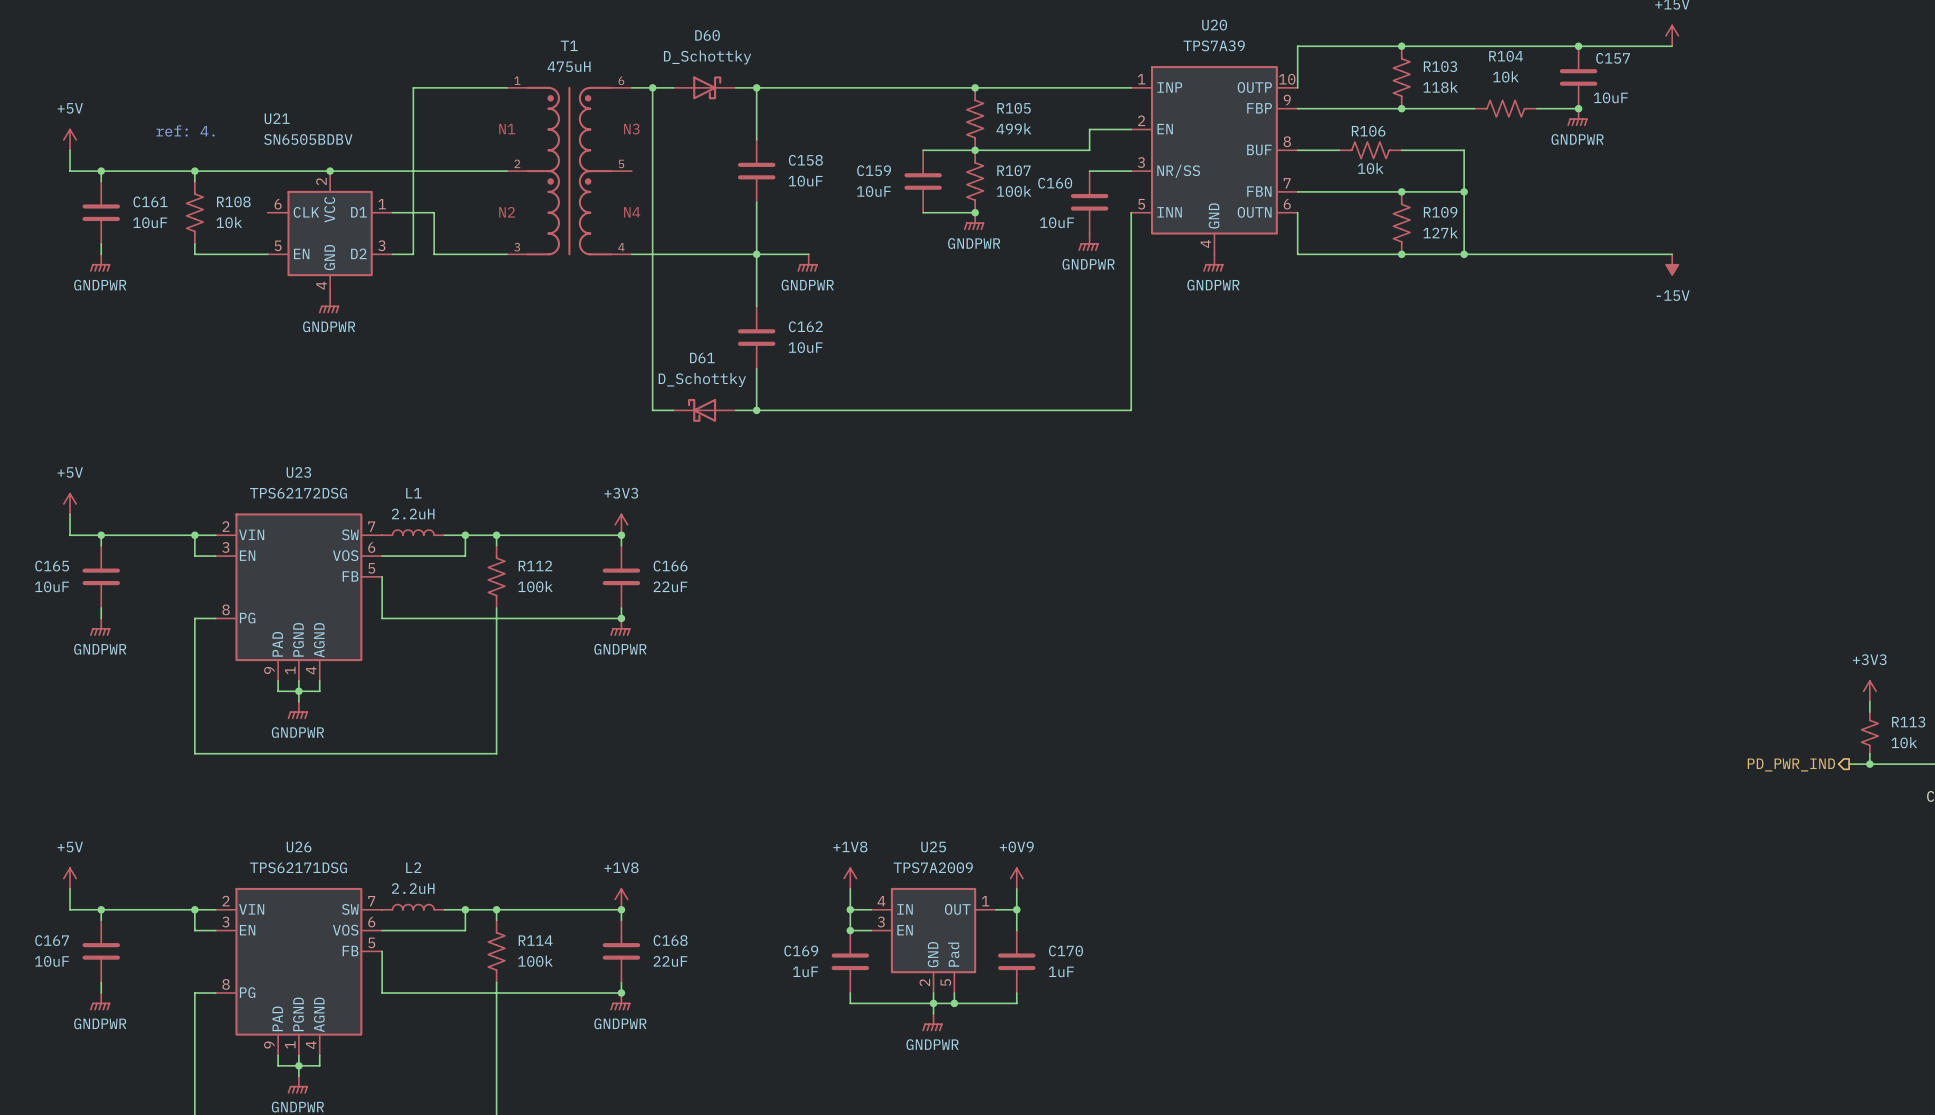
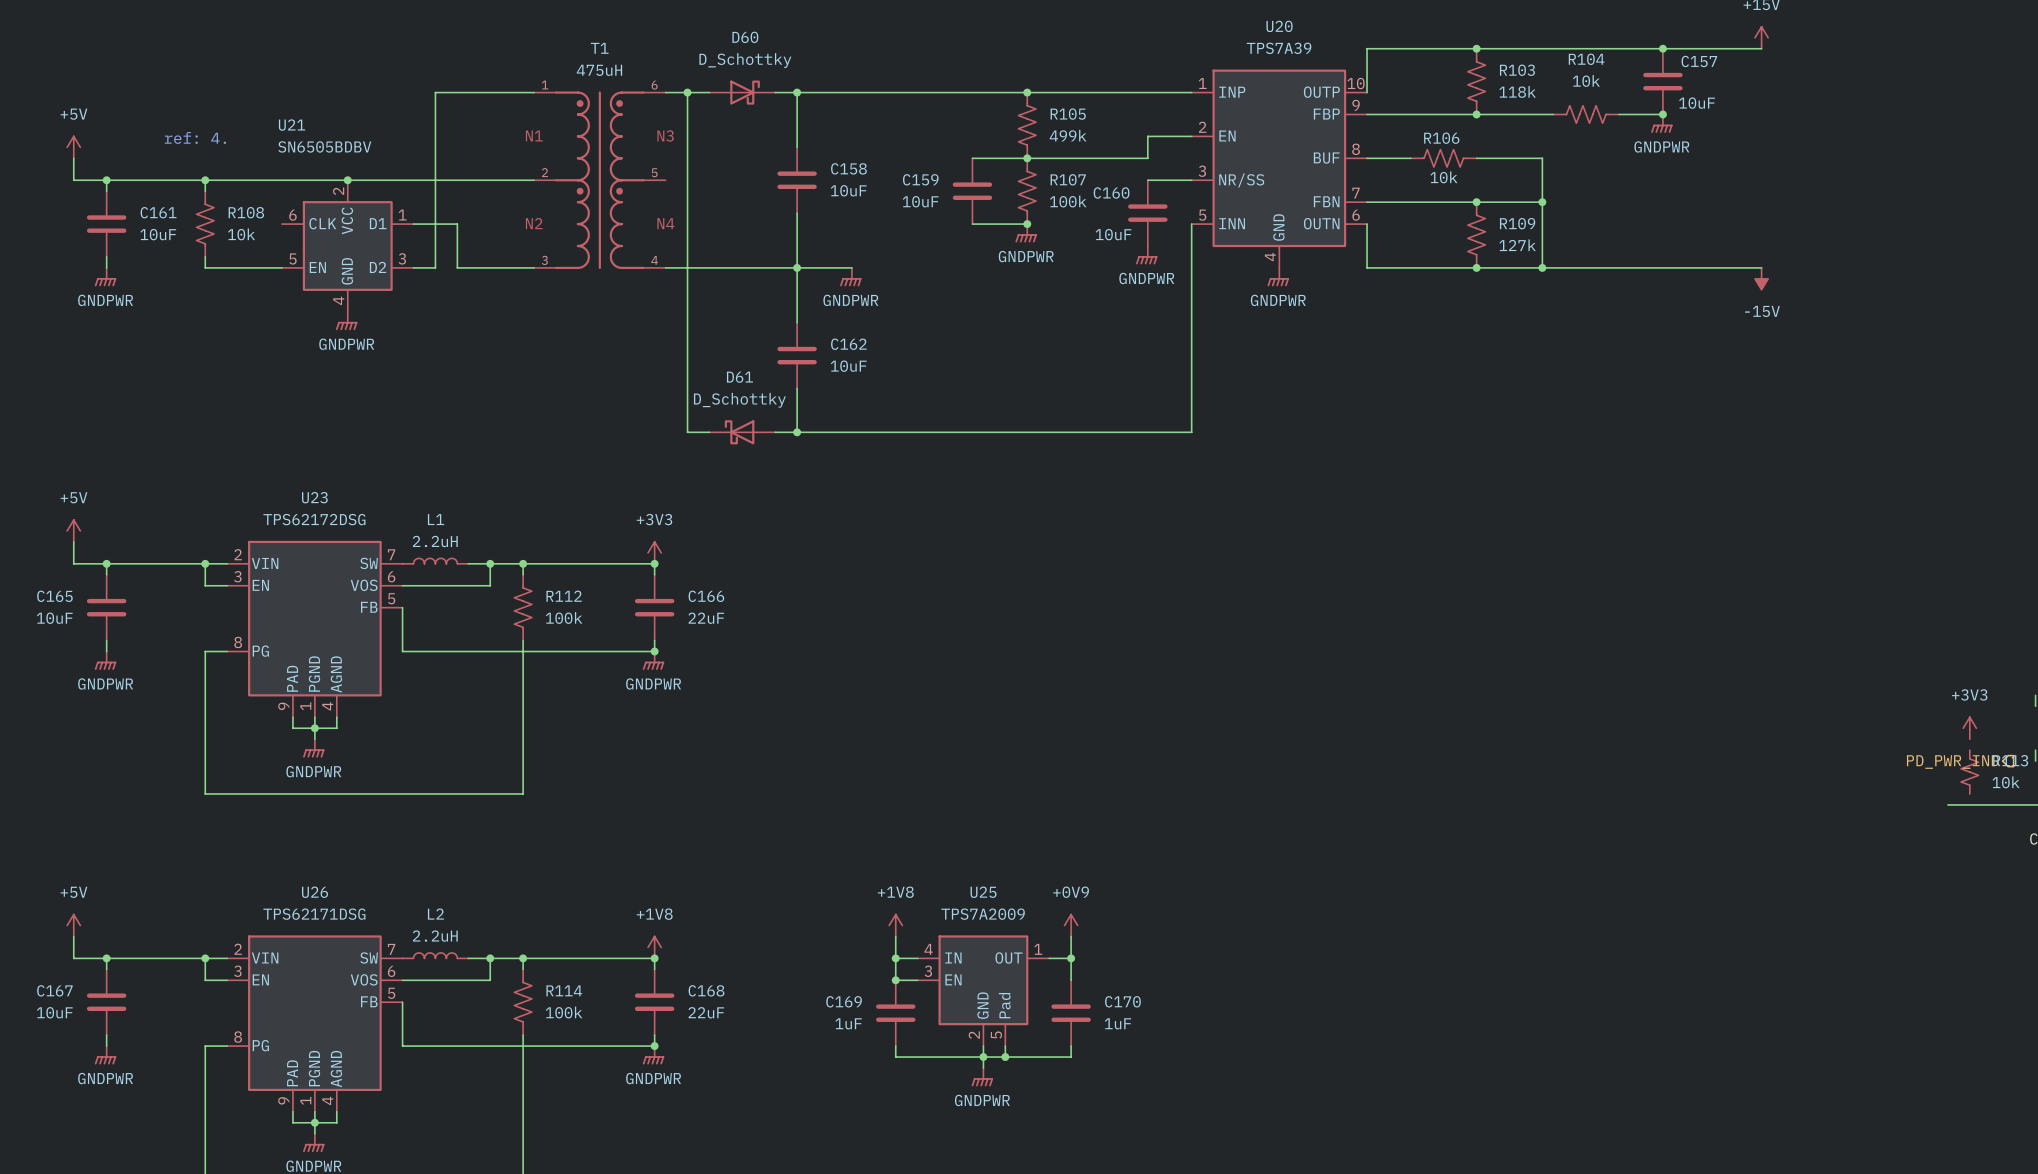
wire: (1869, 701) (1869, 712) -> (2035, 695) (2035, 706)
wire: (1869, 753) (1869, 764) -> (2035, 750) (2035, 761)
hierarchical label position: PD_PWR_IND (1791, 764) -> PD_PWR_IND (1952, 762)
junction: (1869, 764) -> none

